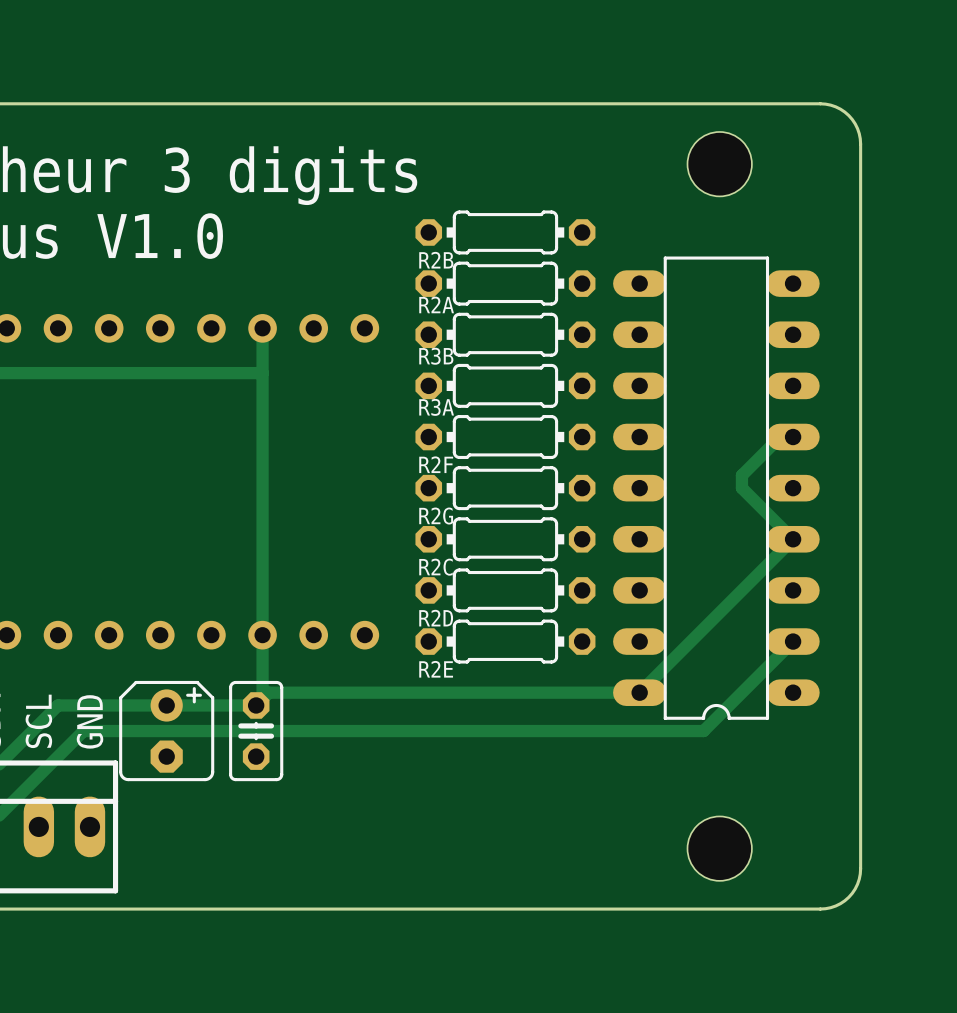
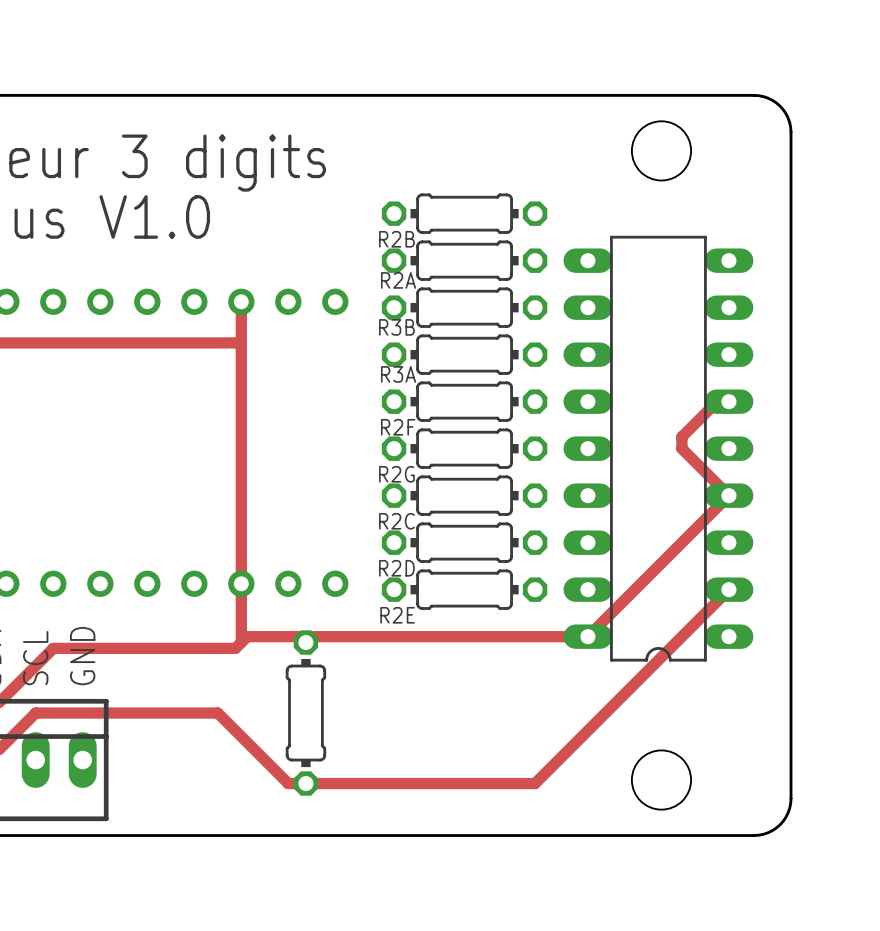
part: (166, 731) -> none
part: (256, 731) -> none
track: (703, 731) (83, 731) (38, 775) -> (646, 671) (535, 783) (288, 783) (217, 713) (35, 713)
part: none -> (305, 713)

